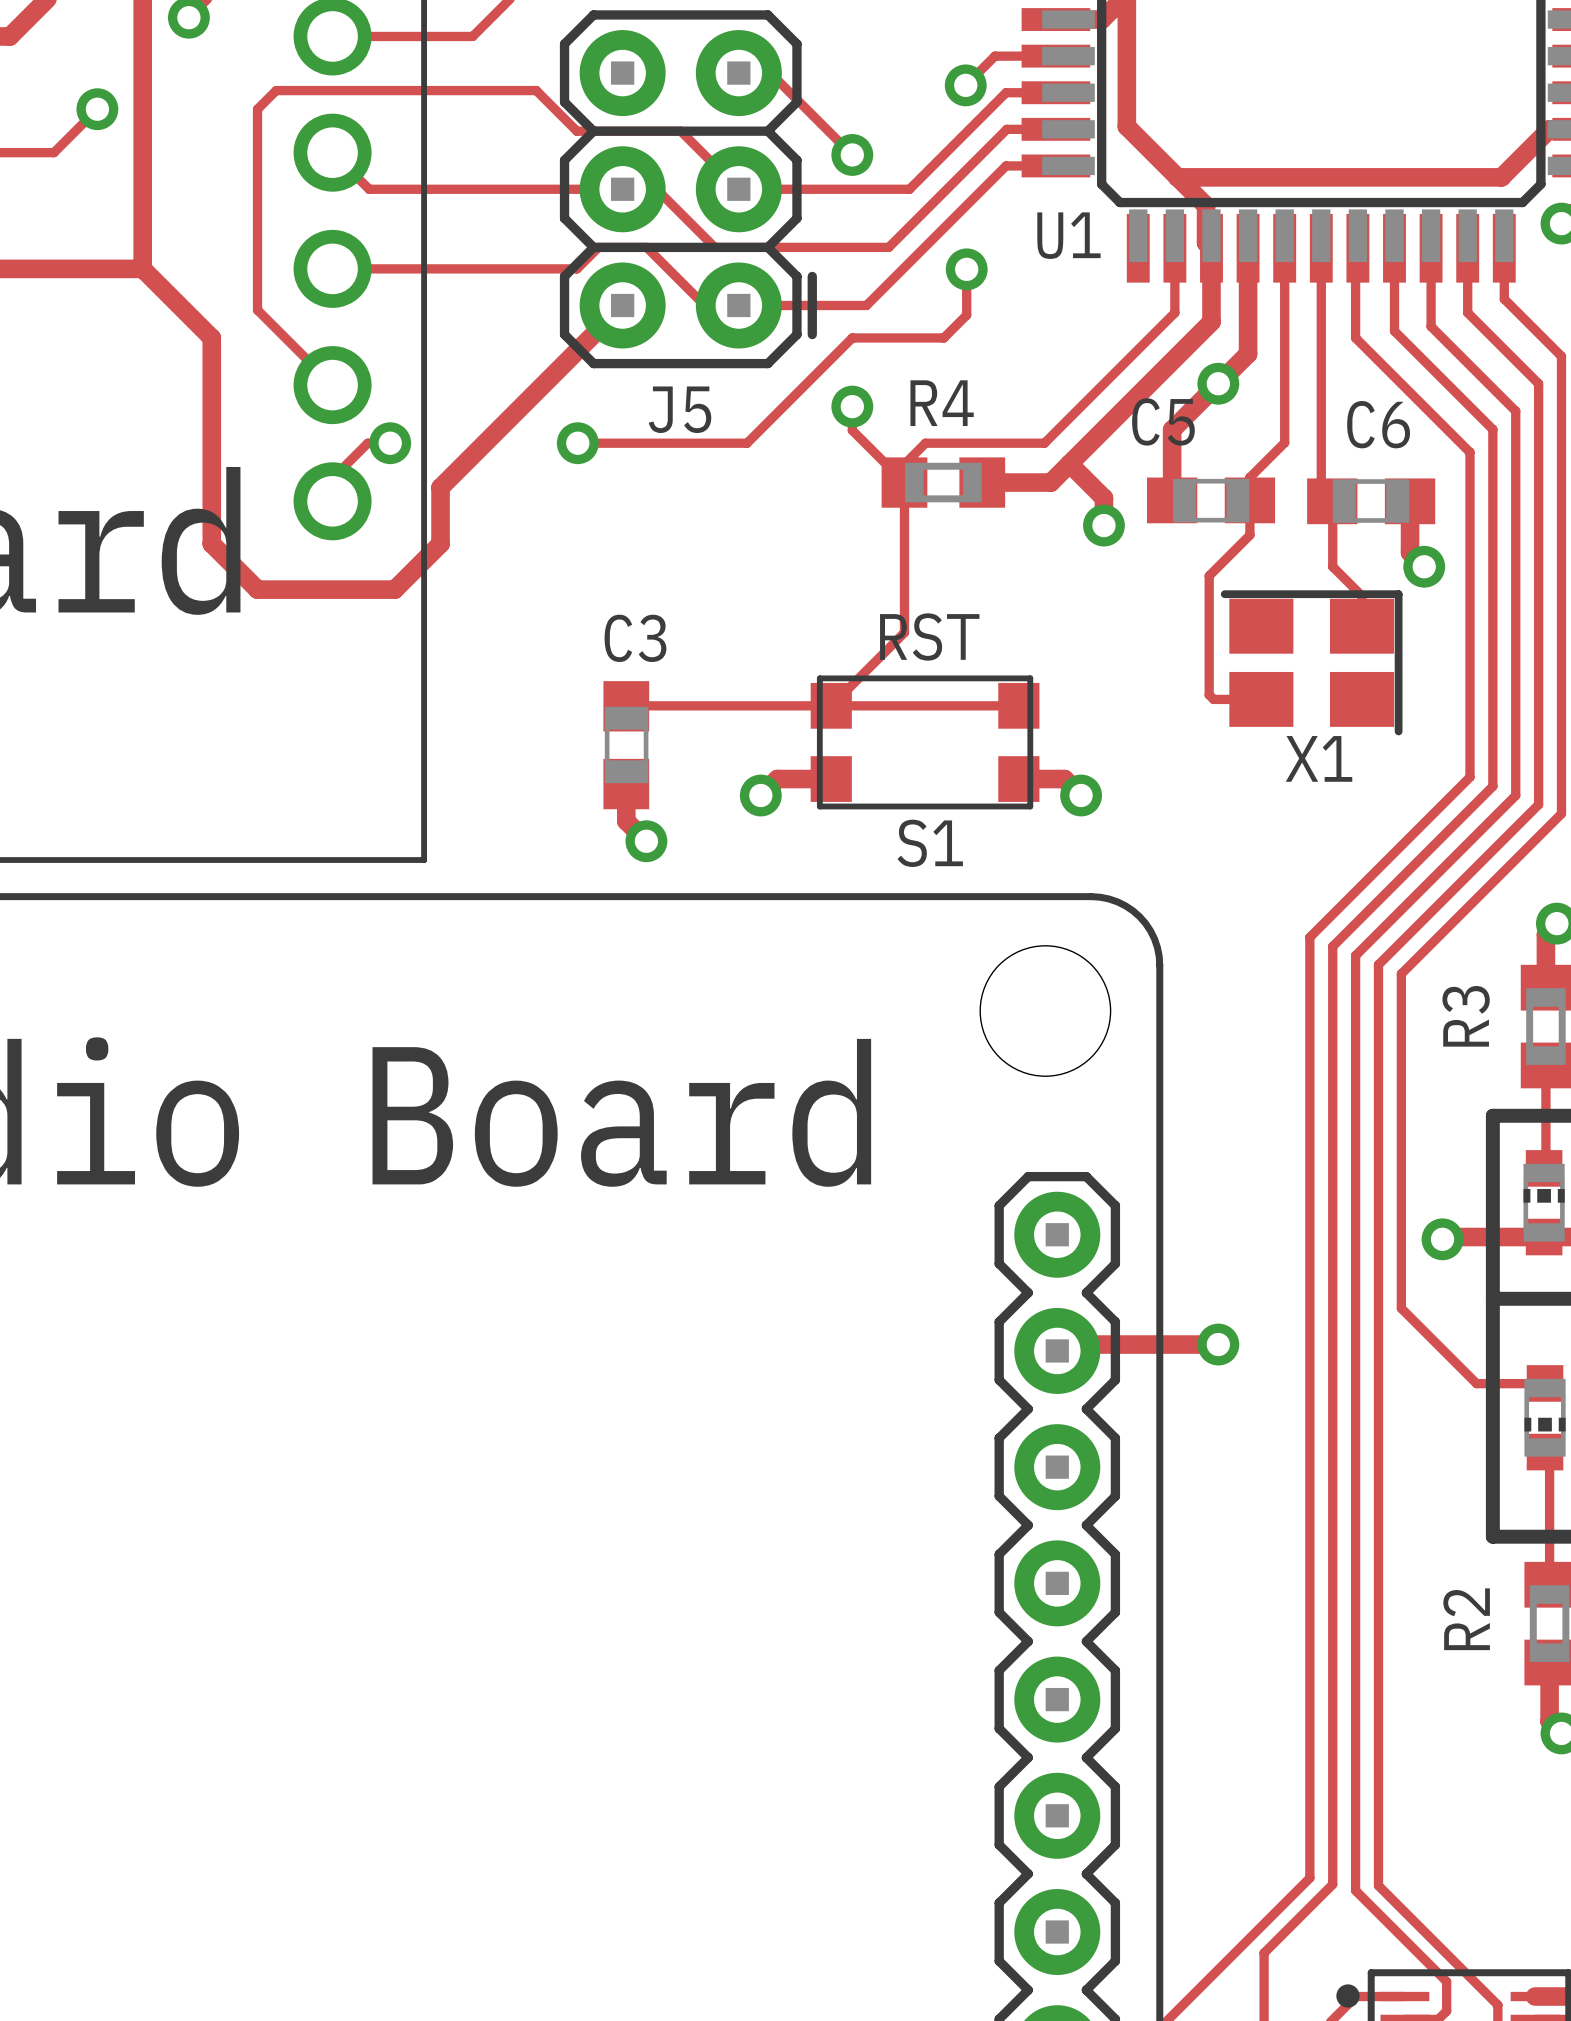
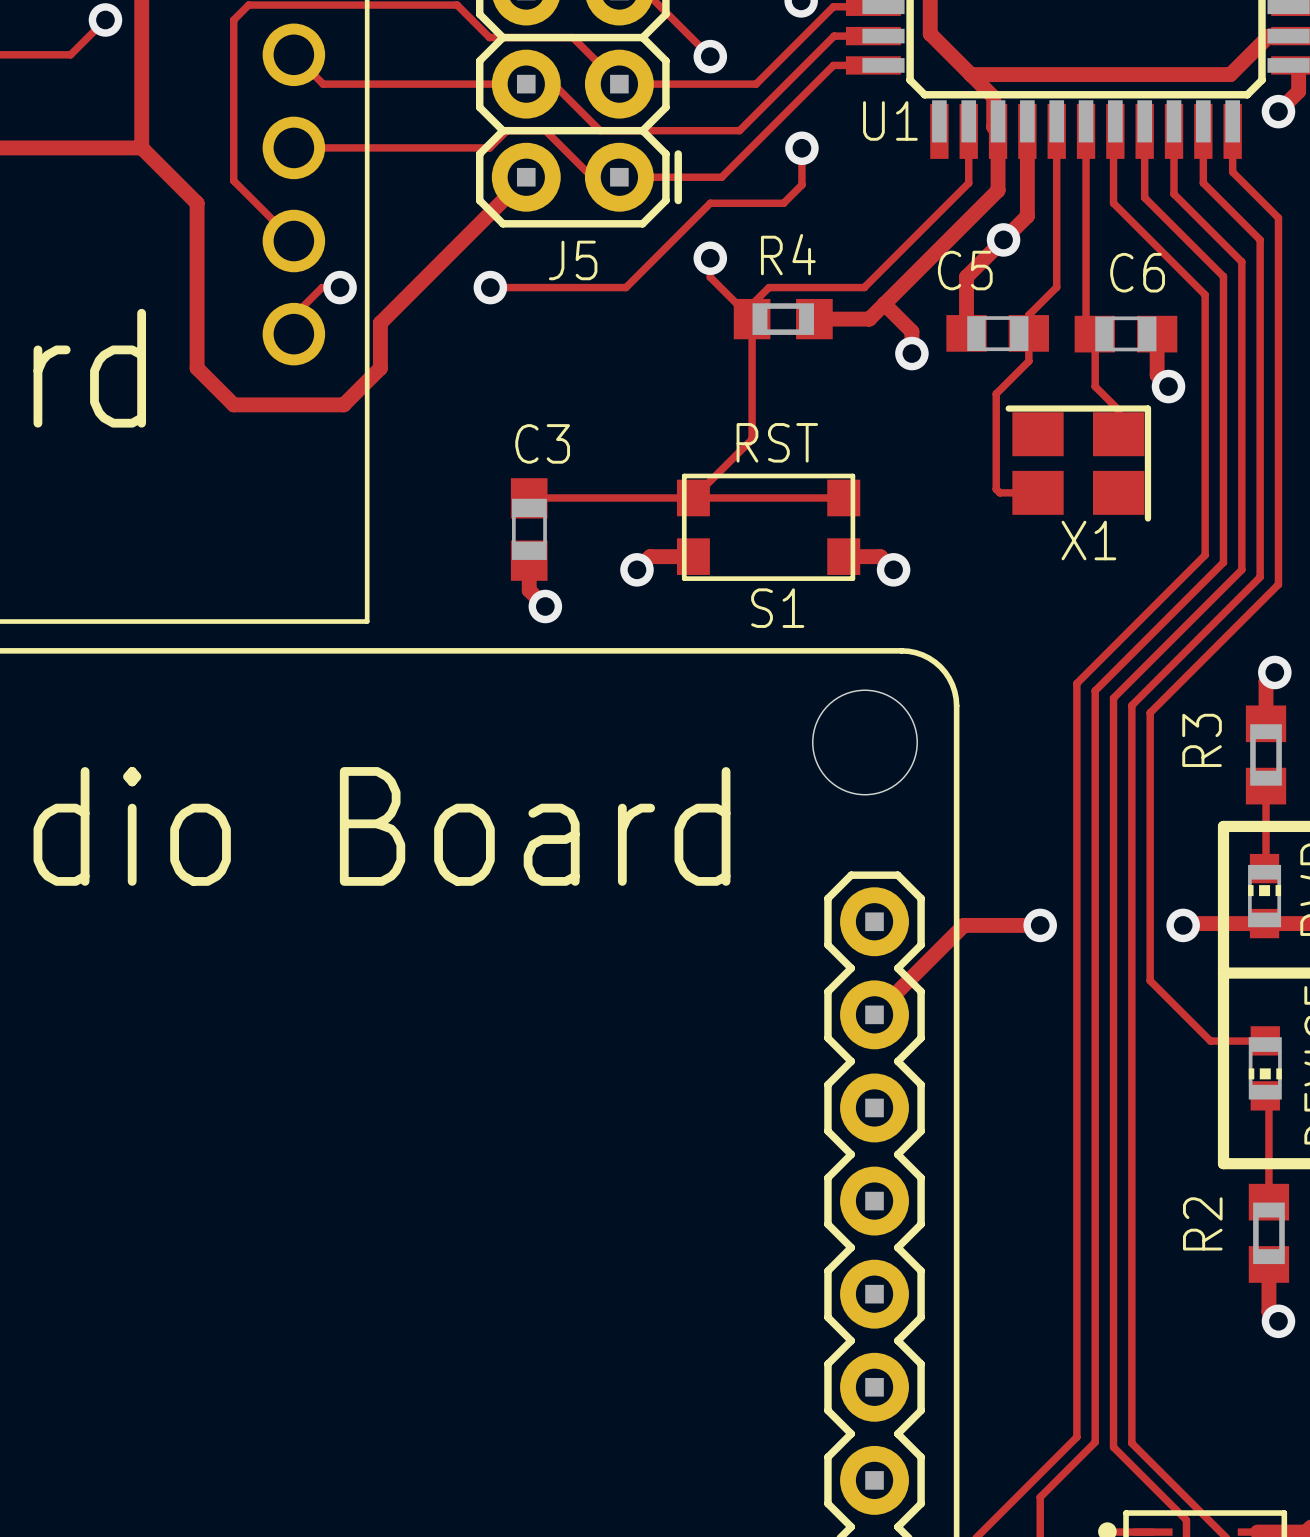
track: (1063, 1344) (1218, 1344) -> (879, 1009) (963, 925) (1040, 925)
via position: (1218, 1344) -> (1040, 925)

